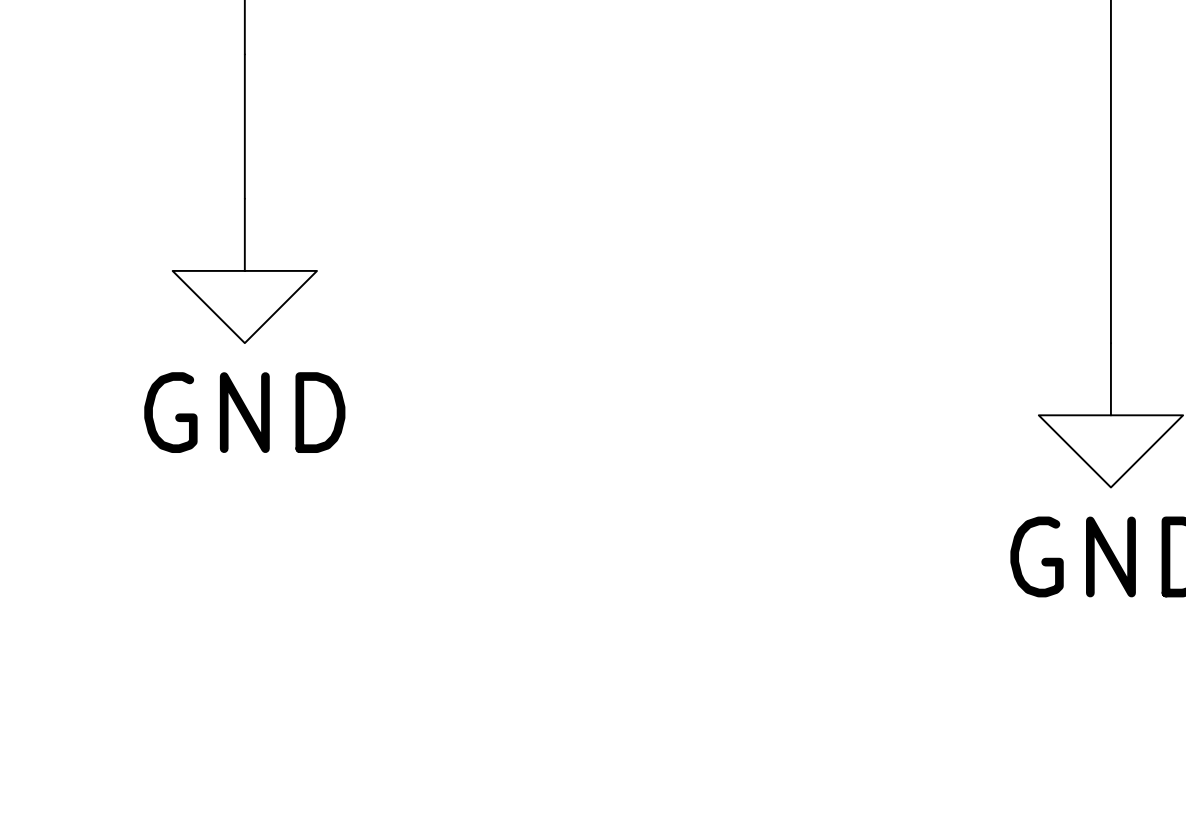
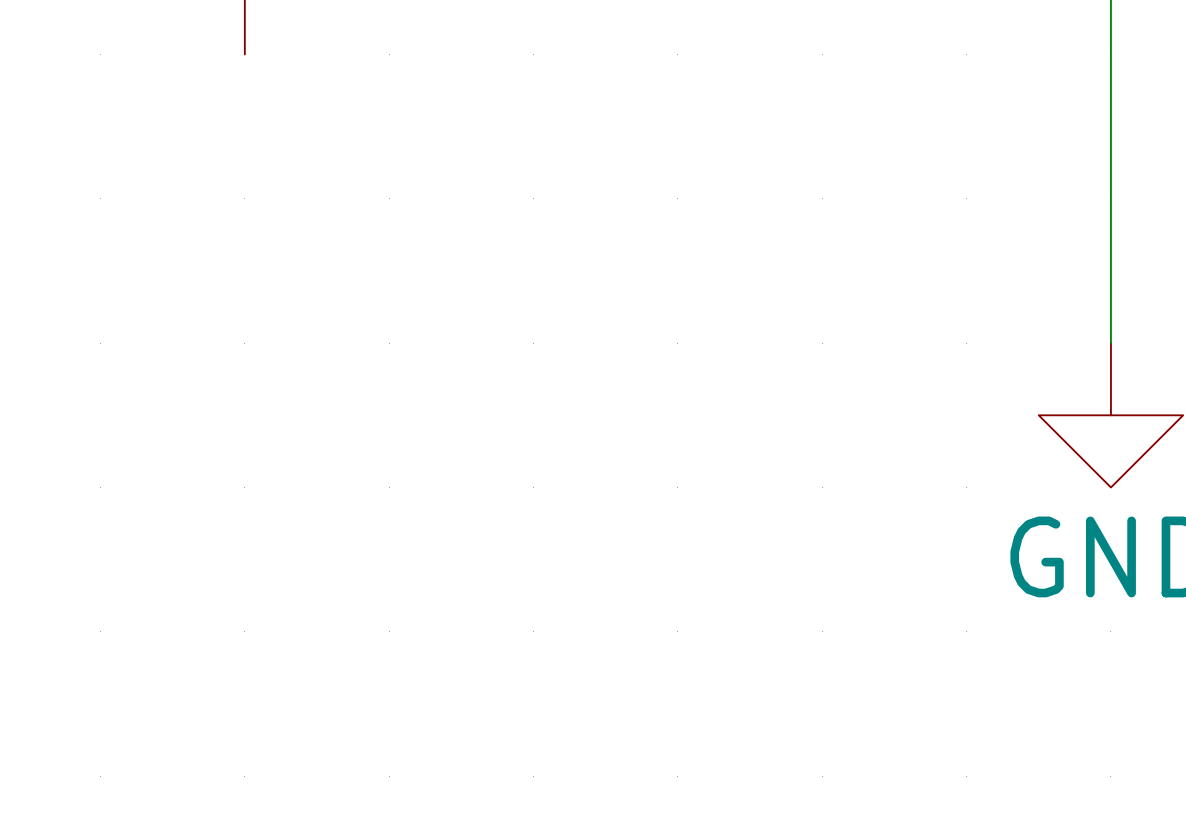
wire: (244, 54) (244, 198) -> none
power symbol: GND (244, 270) -> none

